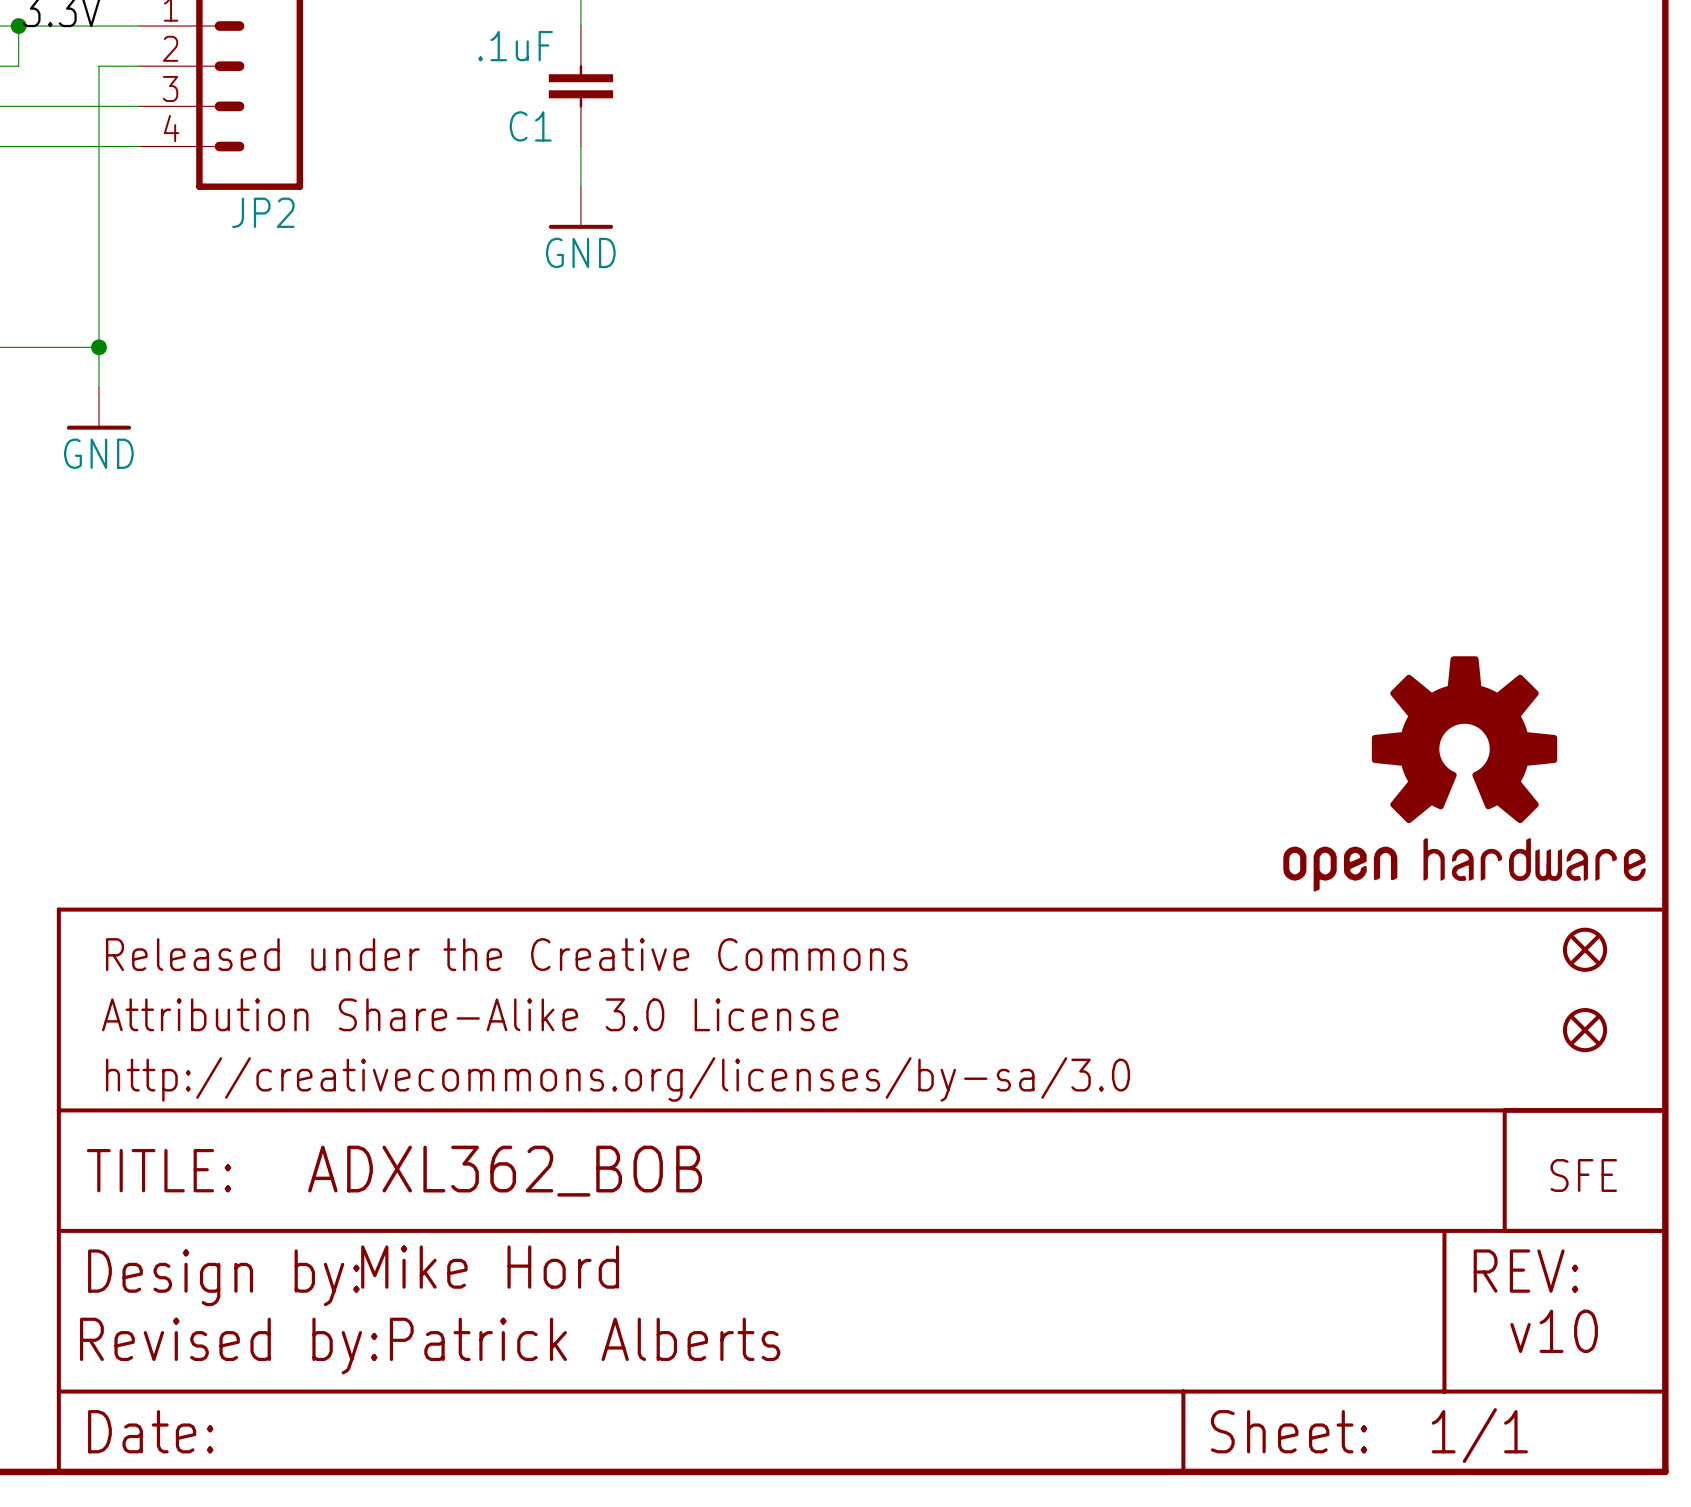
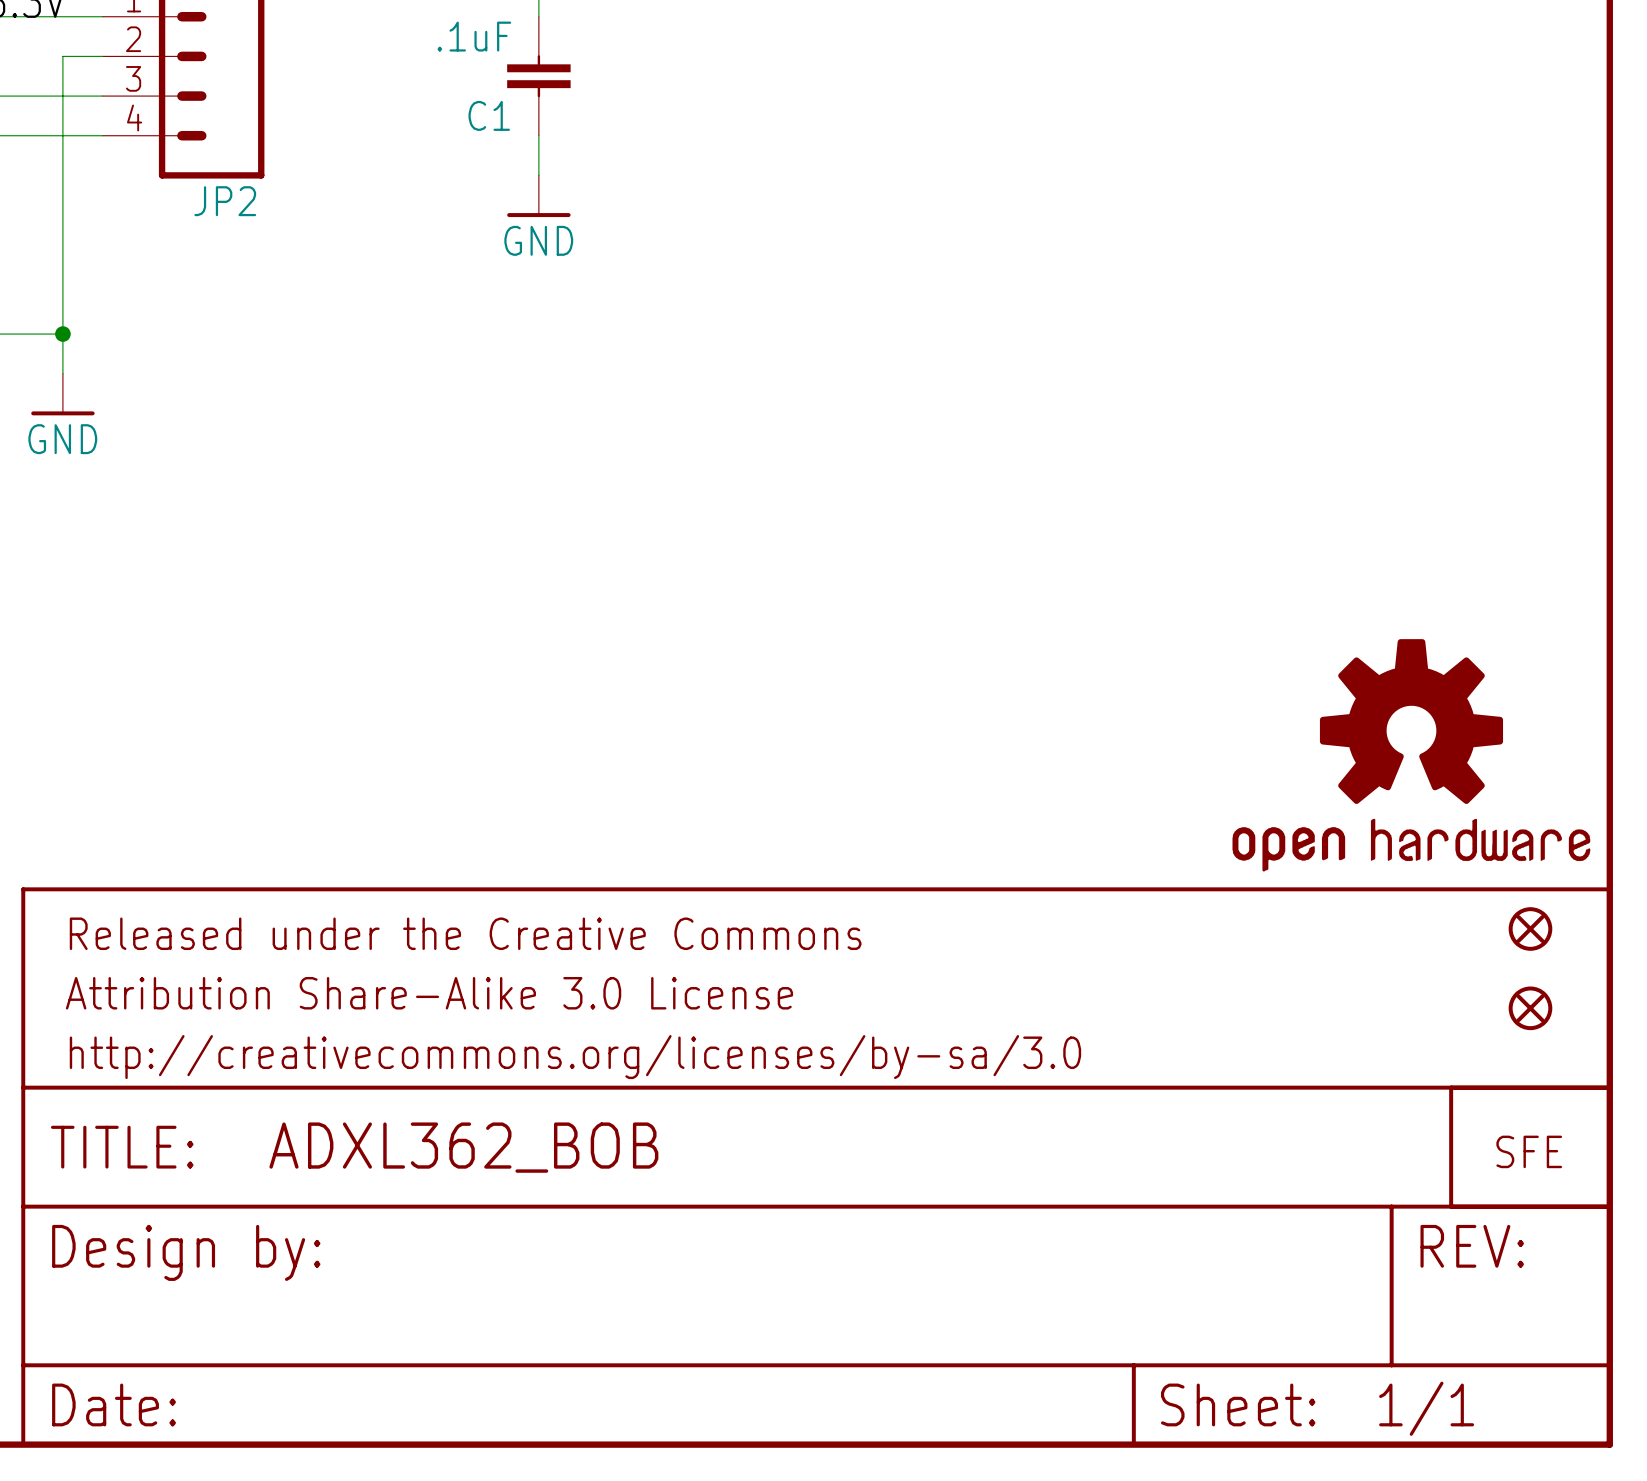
text: Mike Hord (490, 1267) -> none
text: v10 (1554, 1331) -> none
text: Revised by:Patrick Alberts (430, 1346) -> none

